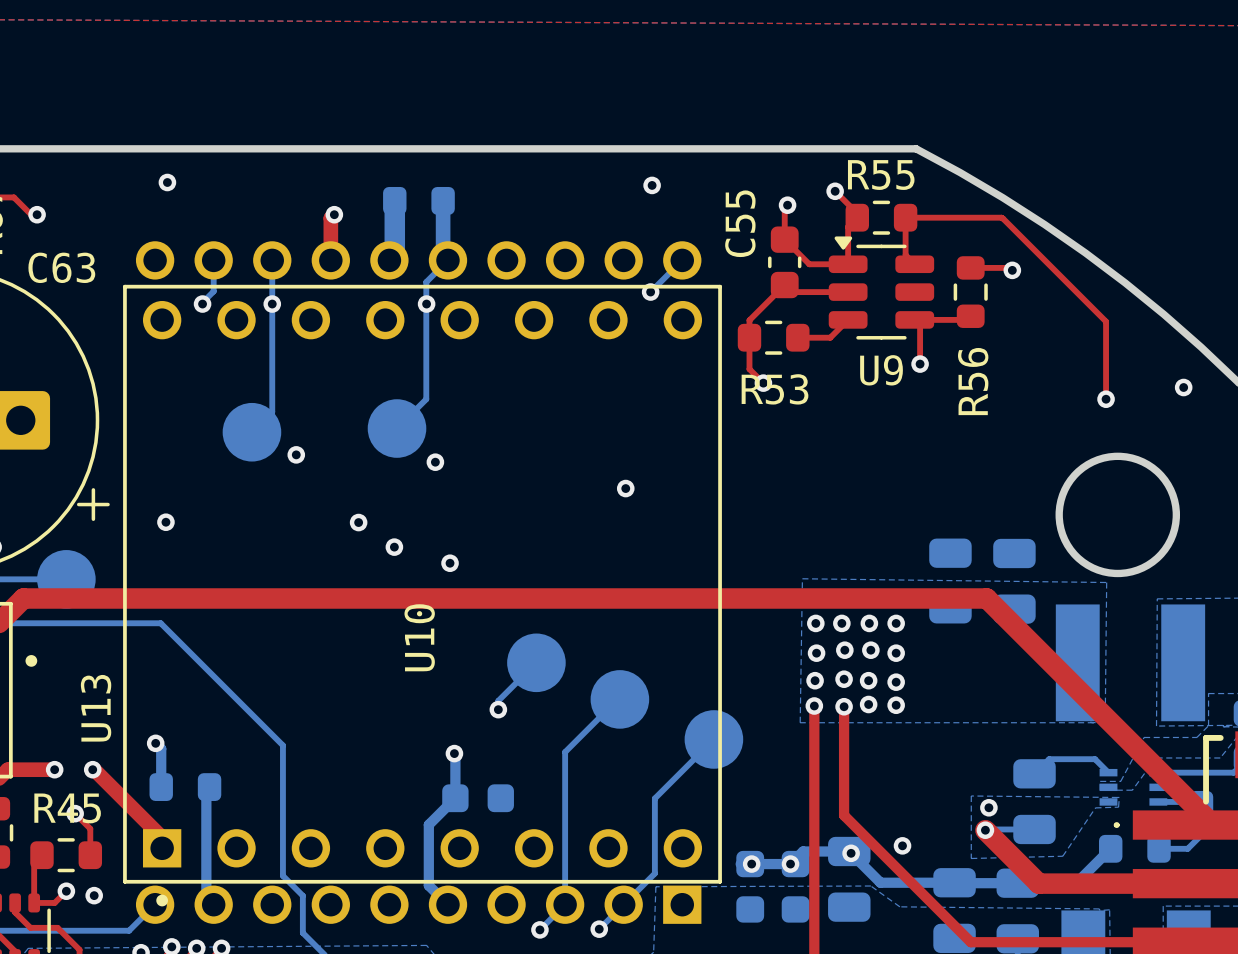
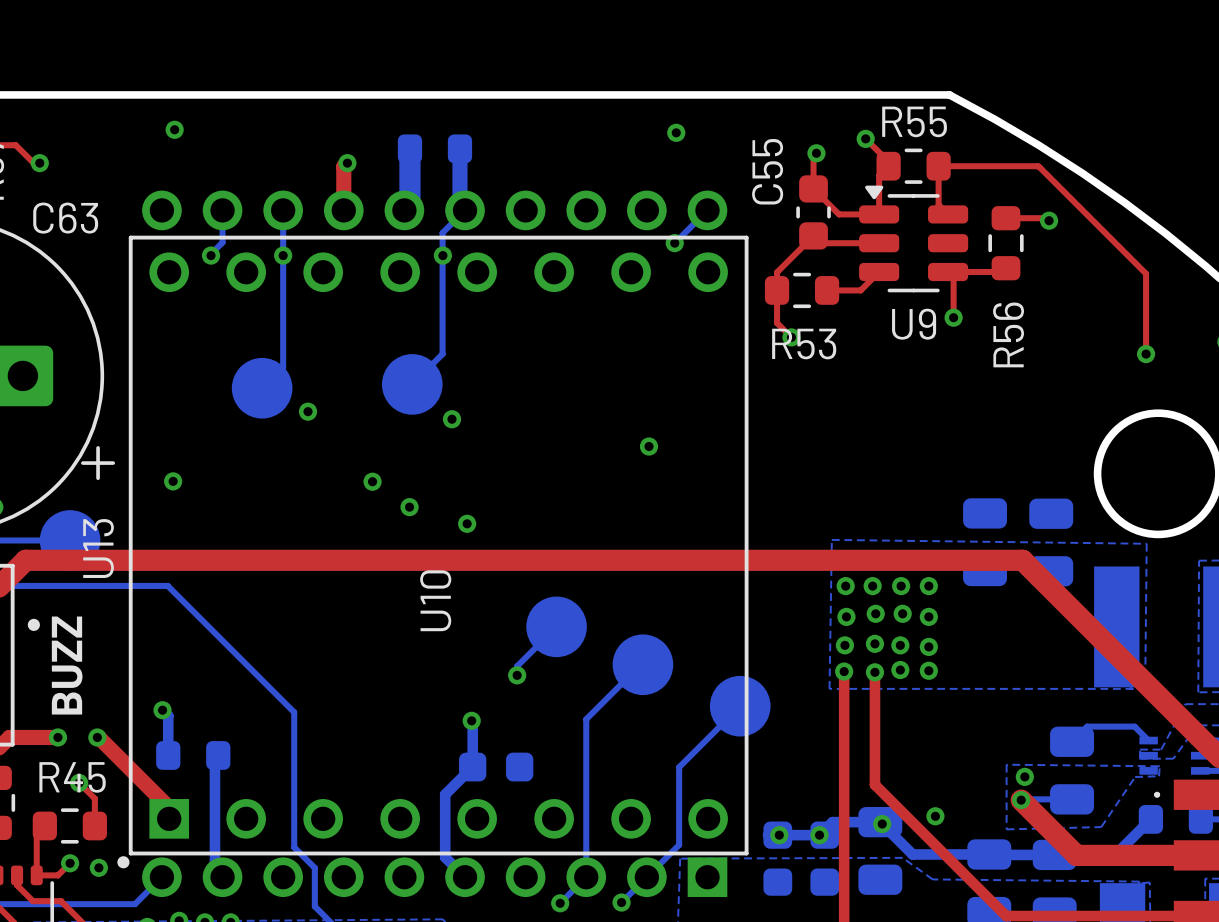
U13 footprint: [123, 284, 722, 907] -> [117, 235, 749, 869]
text: none -> BUZZ (67, 665)
U13 name position: U13 (96, 708) -> U13 (98, 548)

